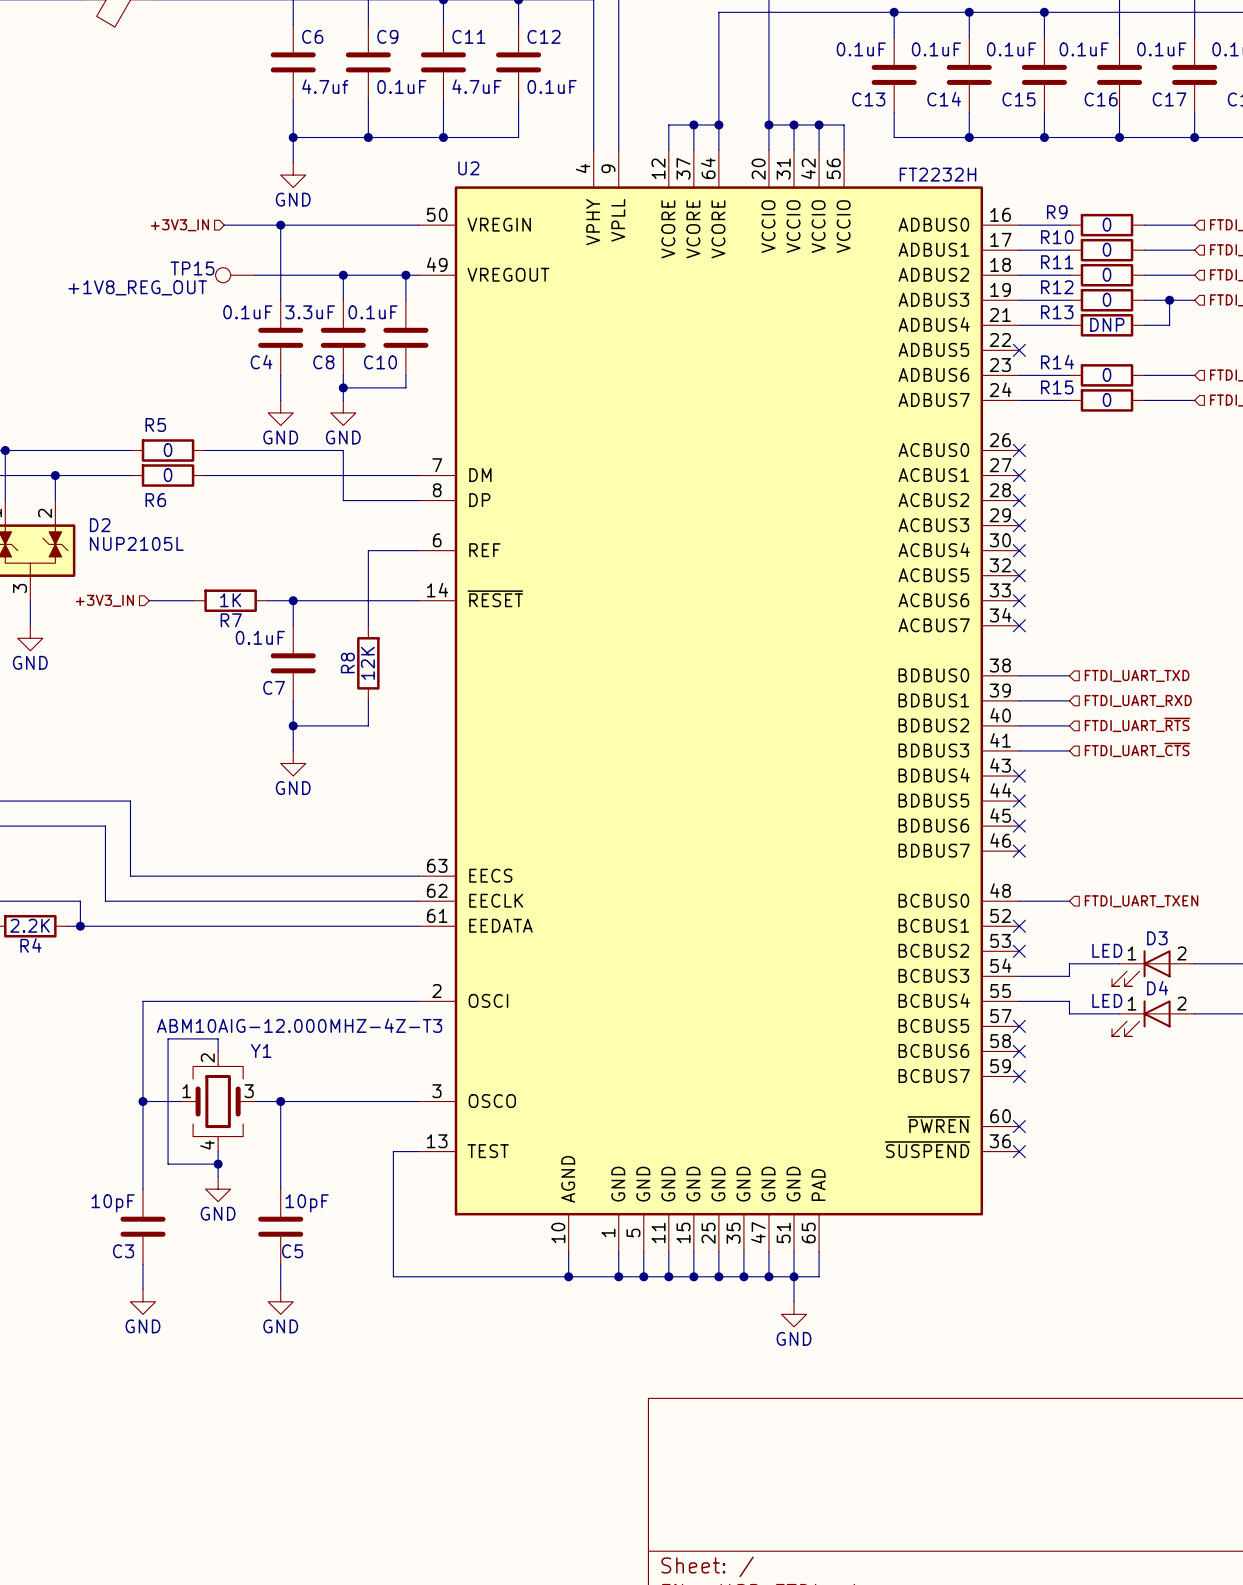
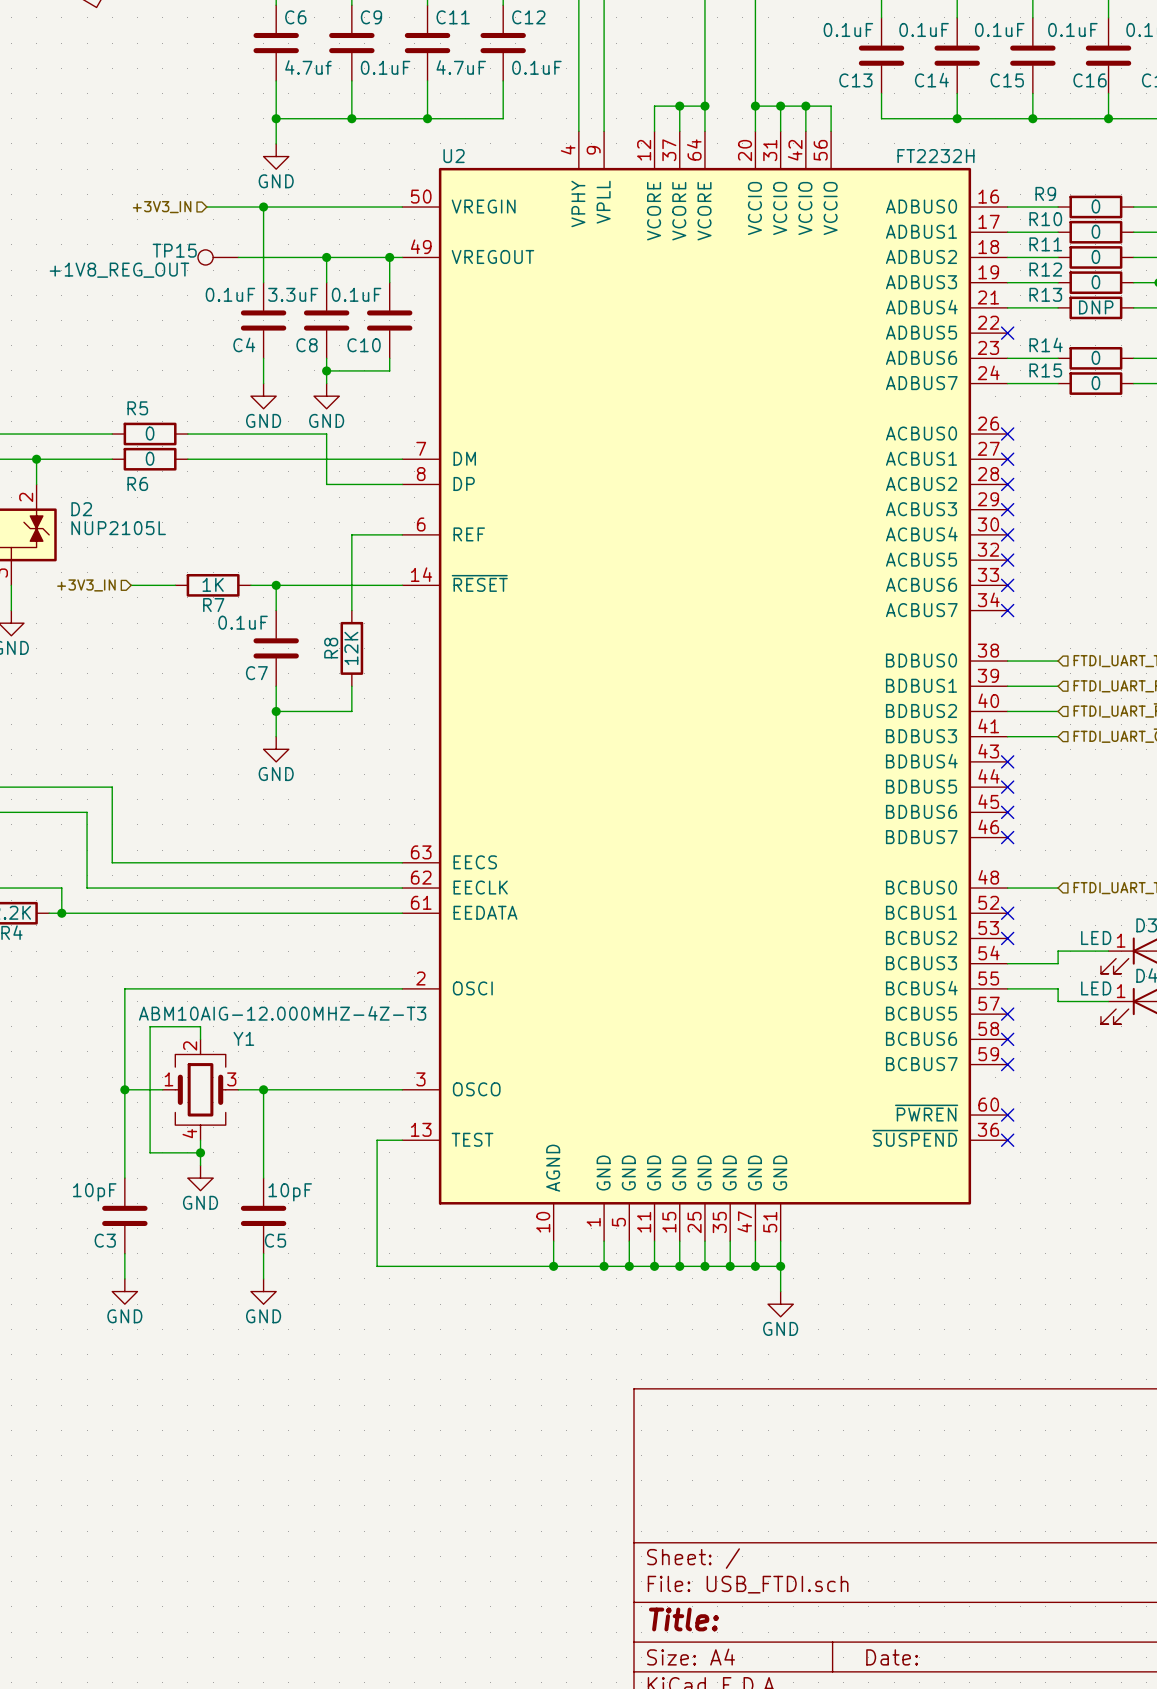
U2 symbol: [418, 150, 1020, 1252] -> [402, 131, 1008, 1242]
wire: (819, 1251) (819, 1276) (794, 1276) -> none

